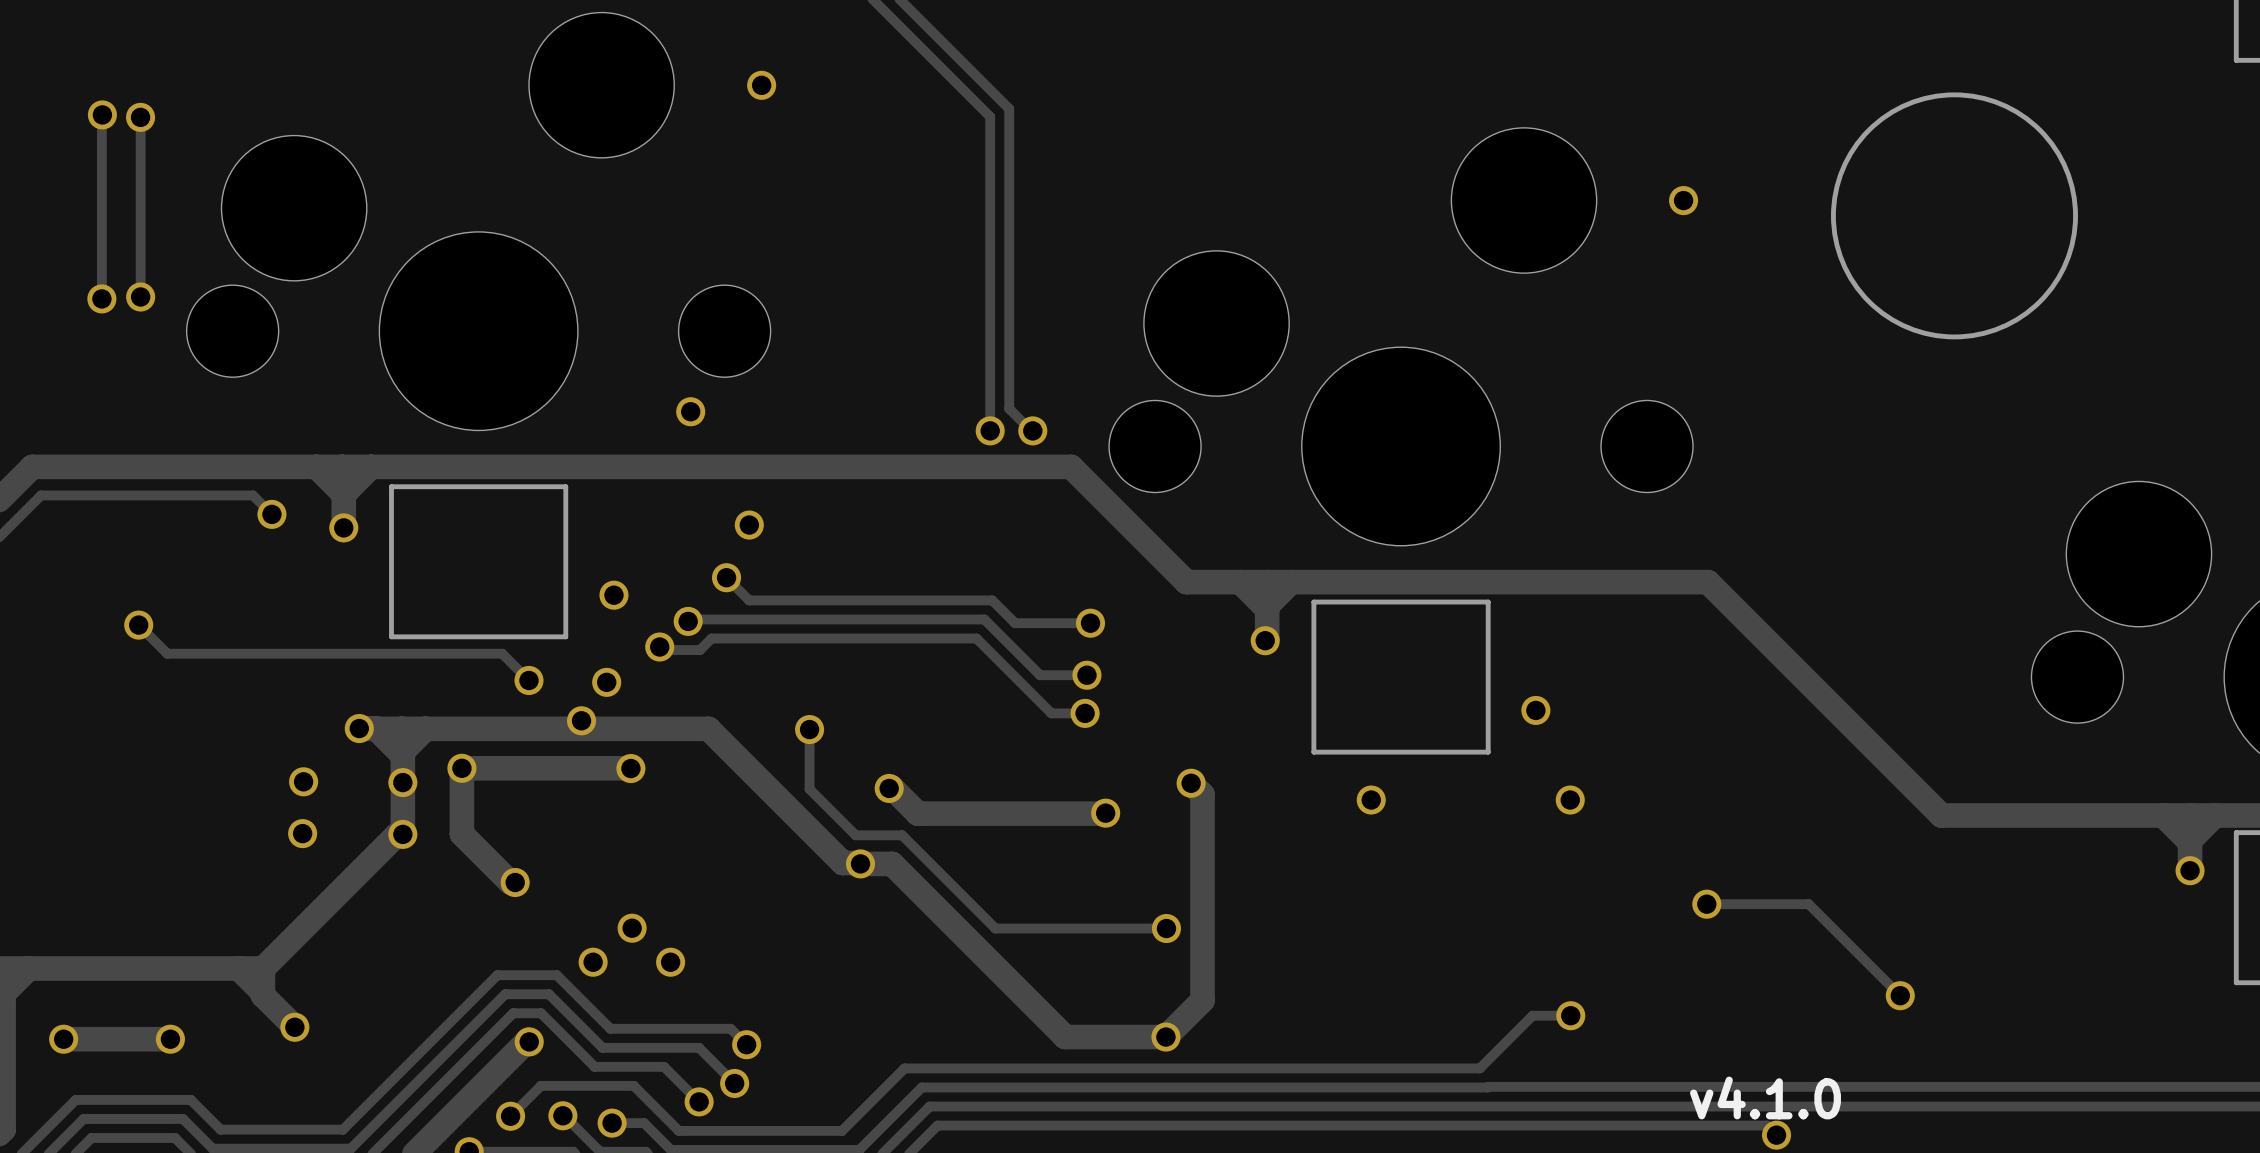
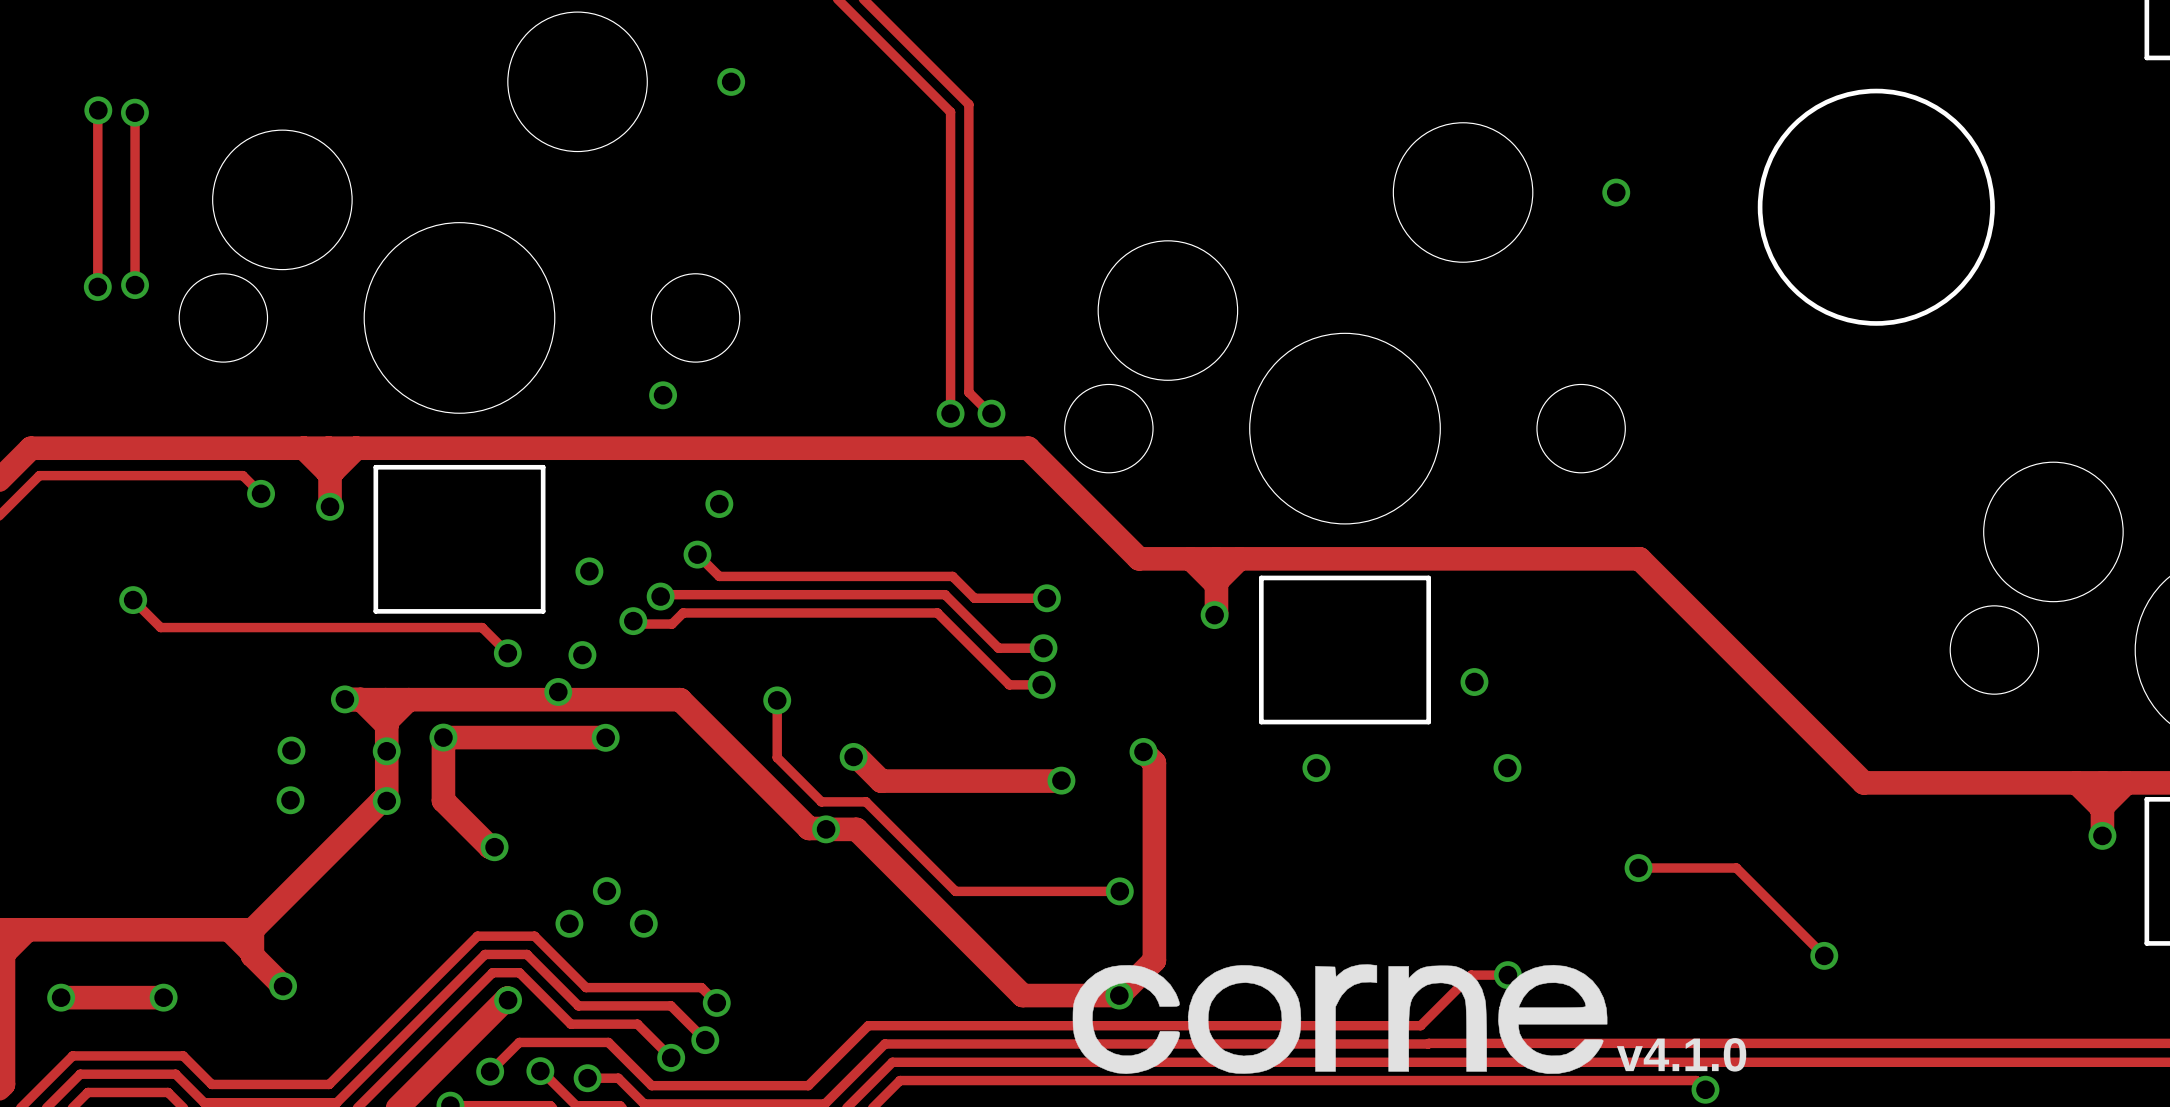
drawing: none -> [1072, 964, 1608, 1074]

